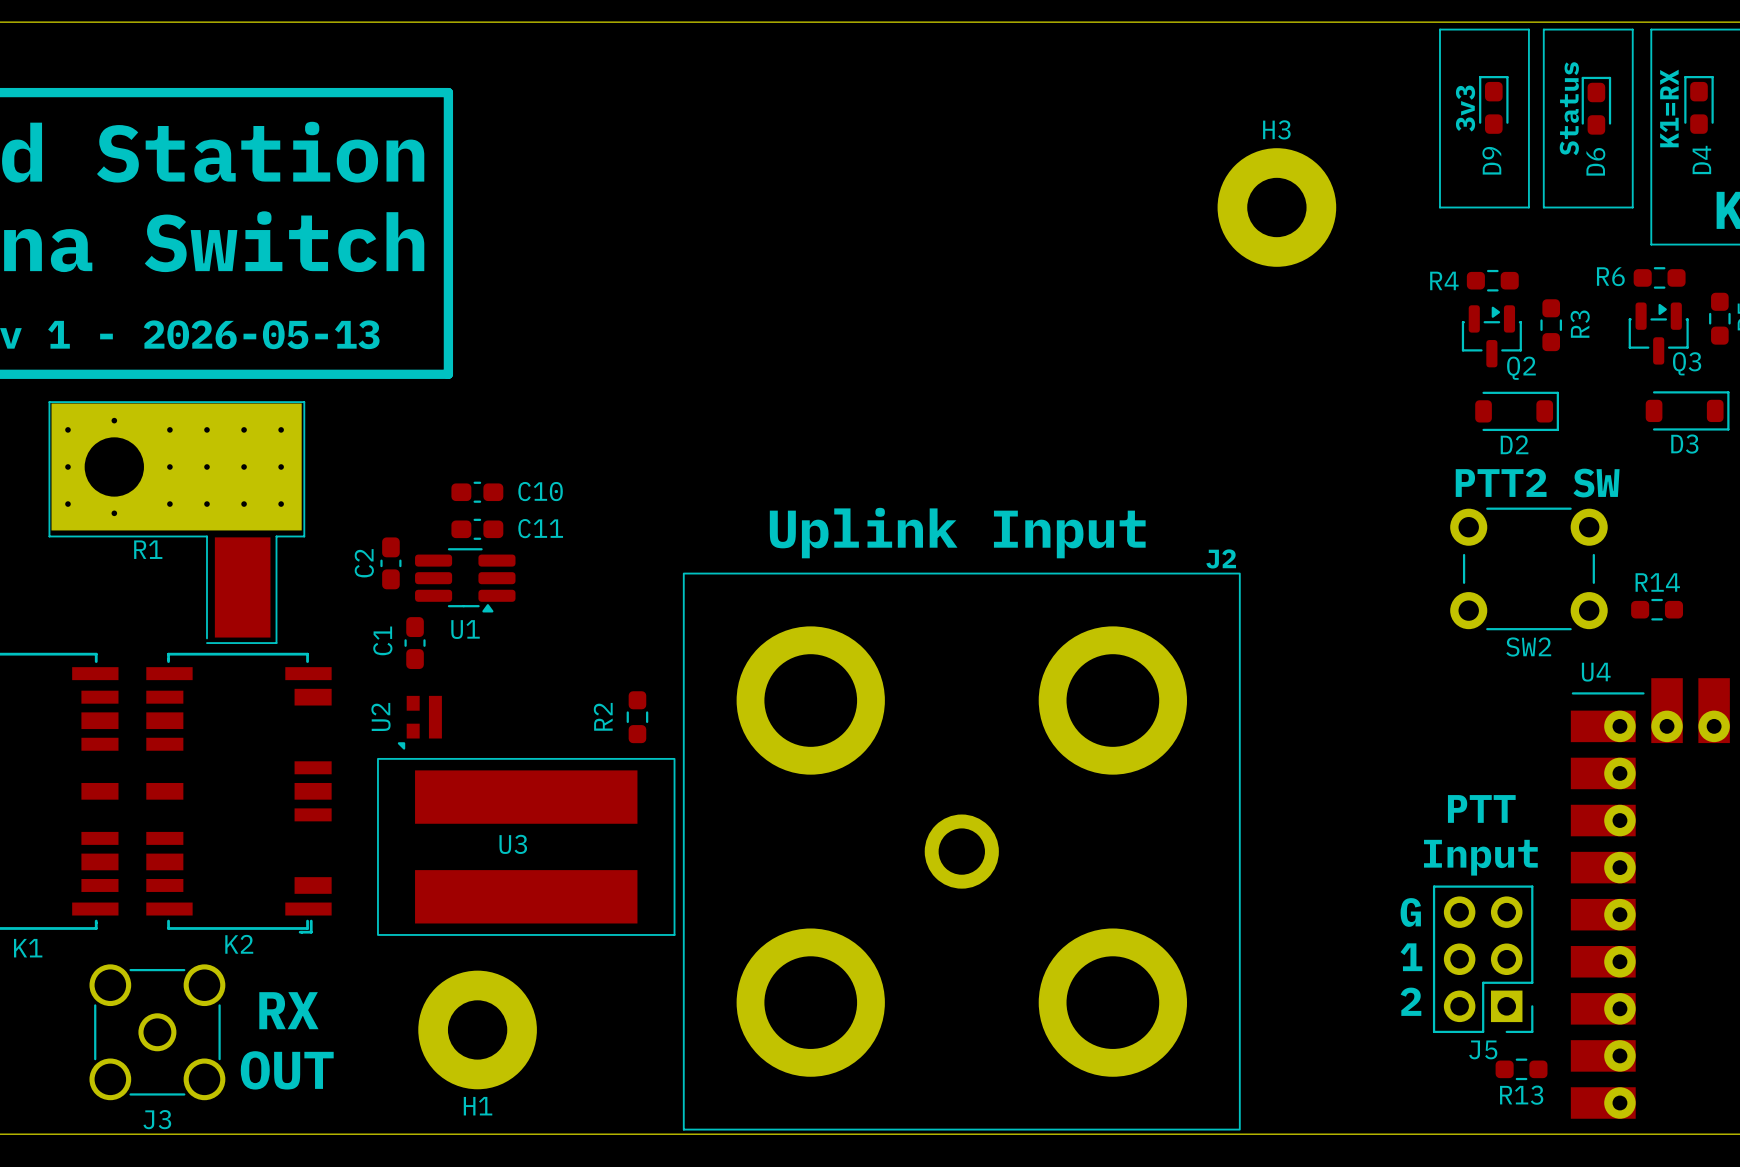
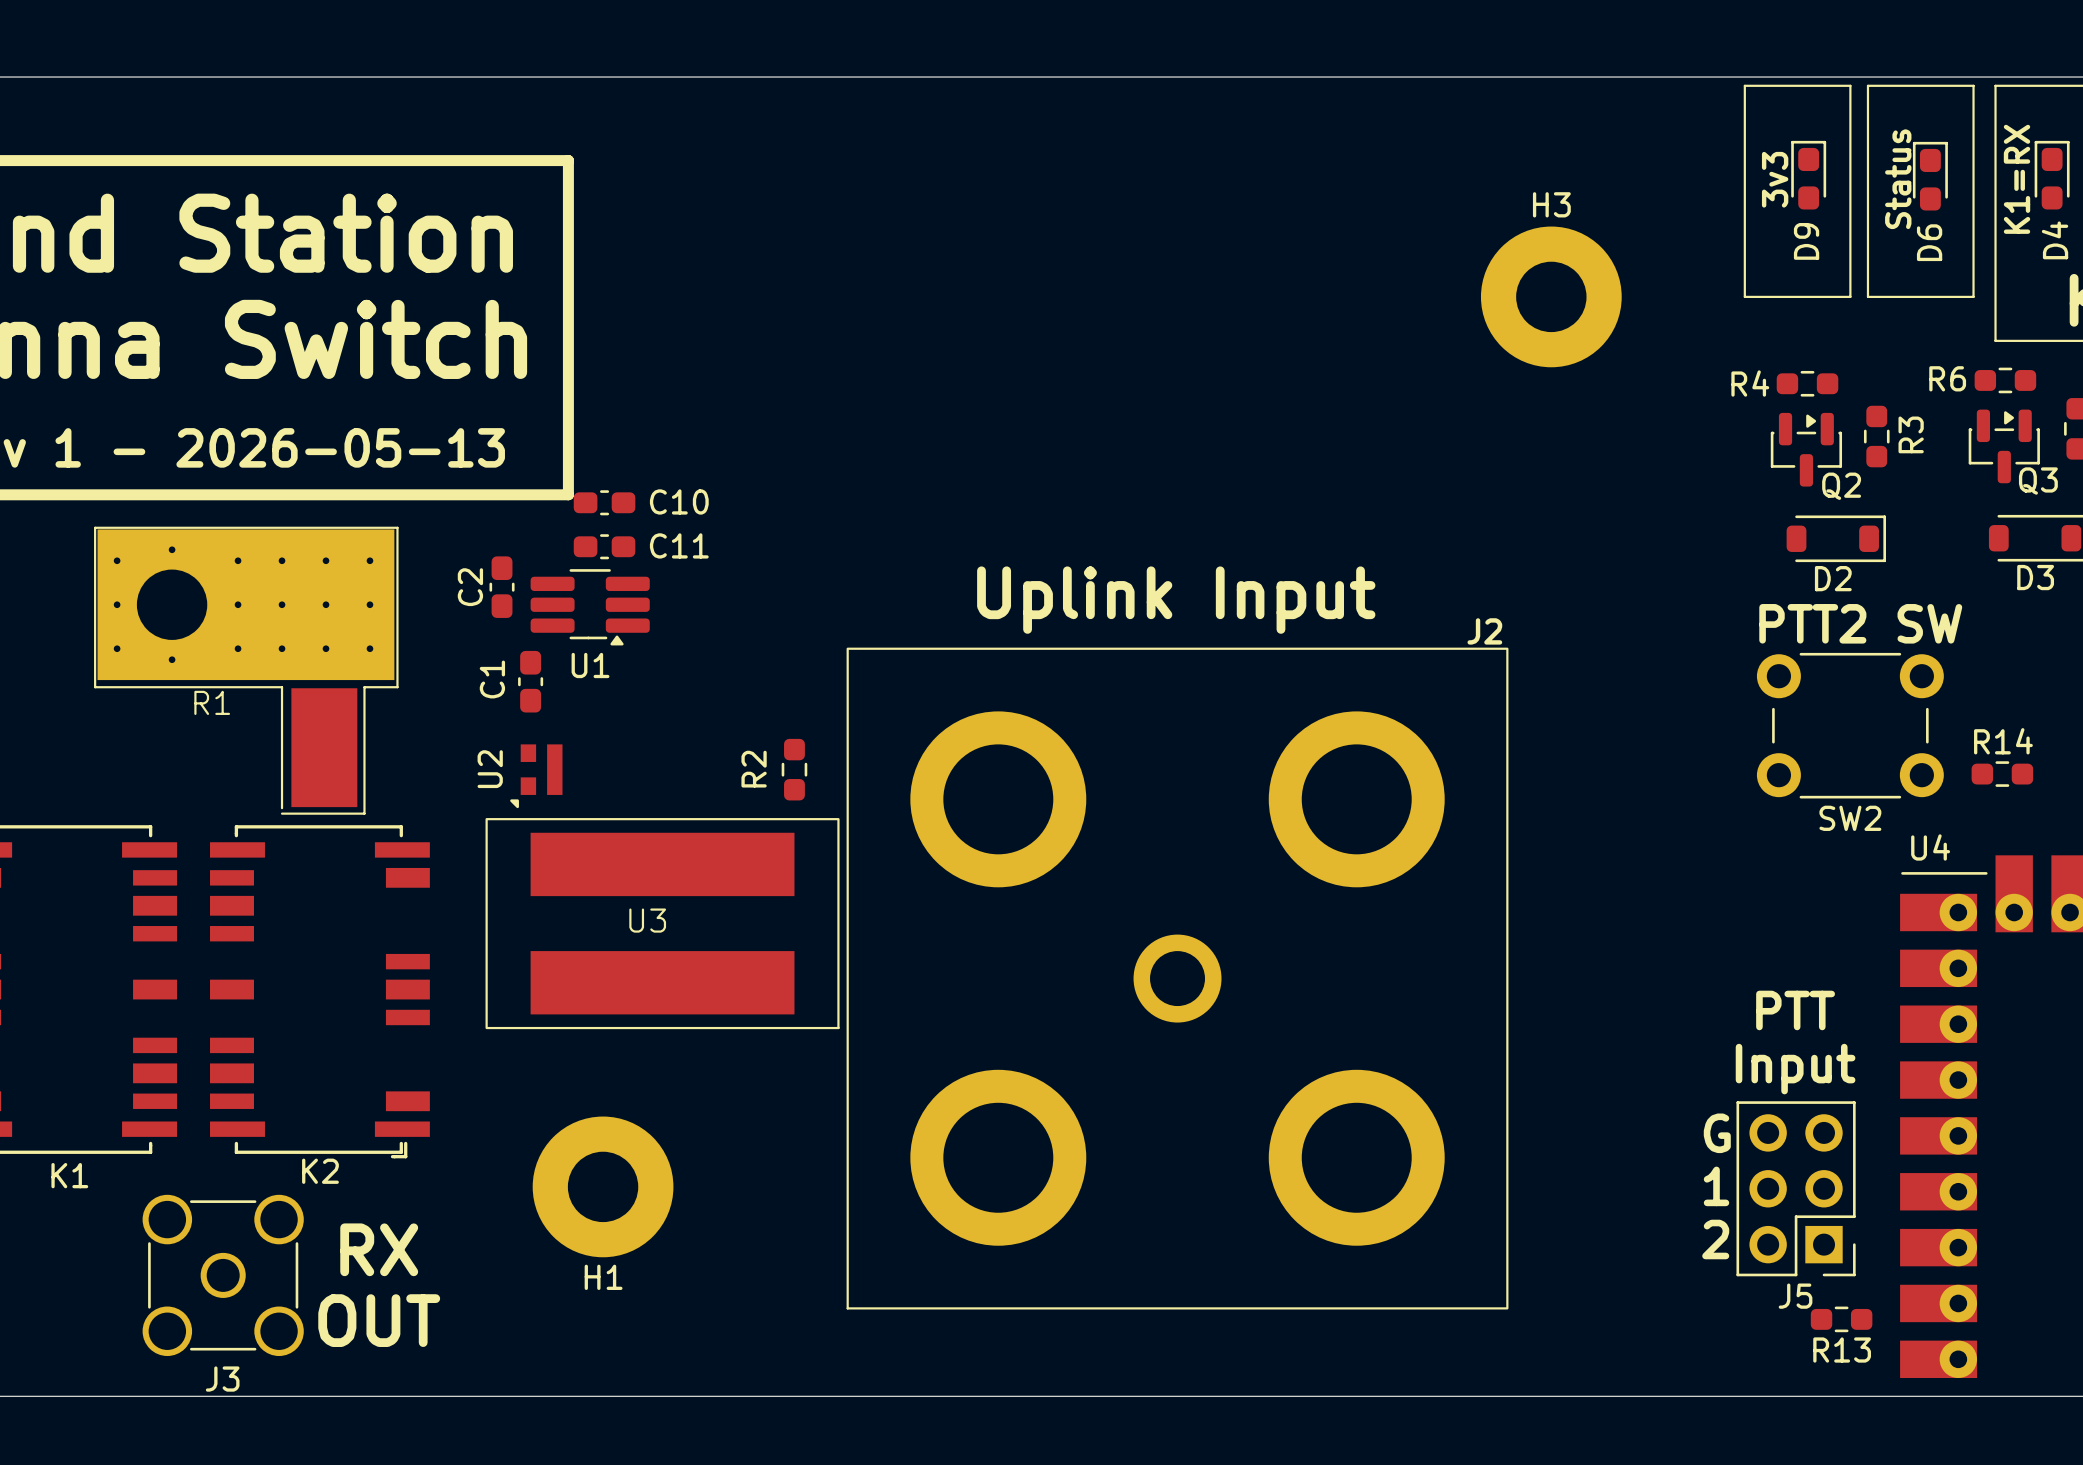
C10 position: (477, 492) -> (604, 502)
C11 position: (477, 529) -> (604, 546)
text position: Uplink Input (957, 533) -> Uplink Input (1176, 600)
C2 position: (390, 563) -> (502, 587)
U1 position: (465, 580) -> (590, 607)
C1 position: (415, 643) -> (530, 681)
R2 position: (637, 717) -> (794, 769)
U2 position: (419, 722) -> (536, 776)
U3 position: (526, 846) -> (662, 923)
J2 position: (961, 851) -> (1177, 978)
H1 position: (477, 1029) -> (603, 1186)

